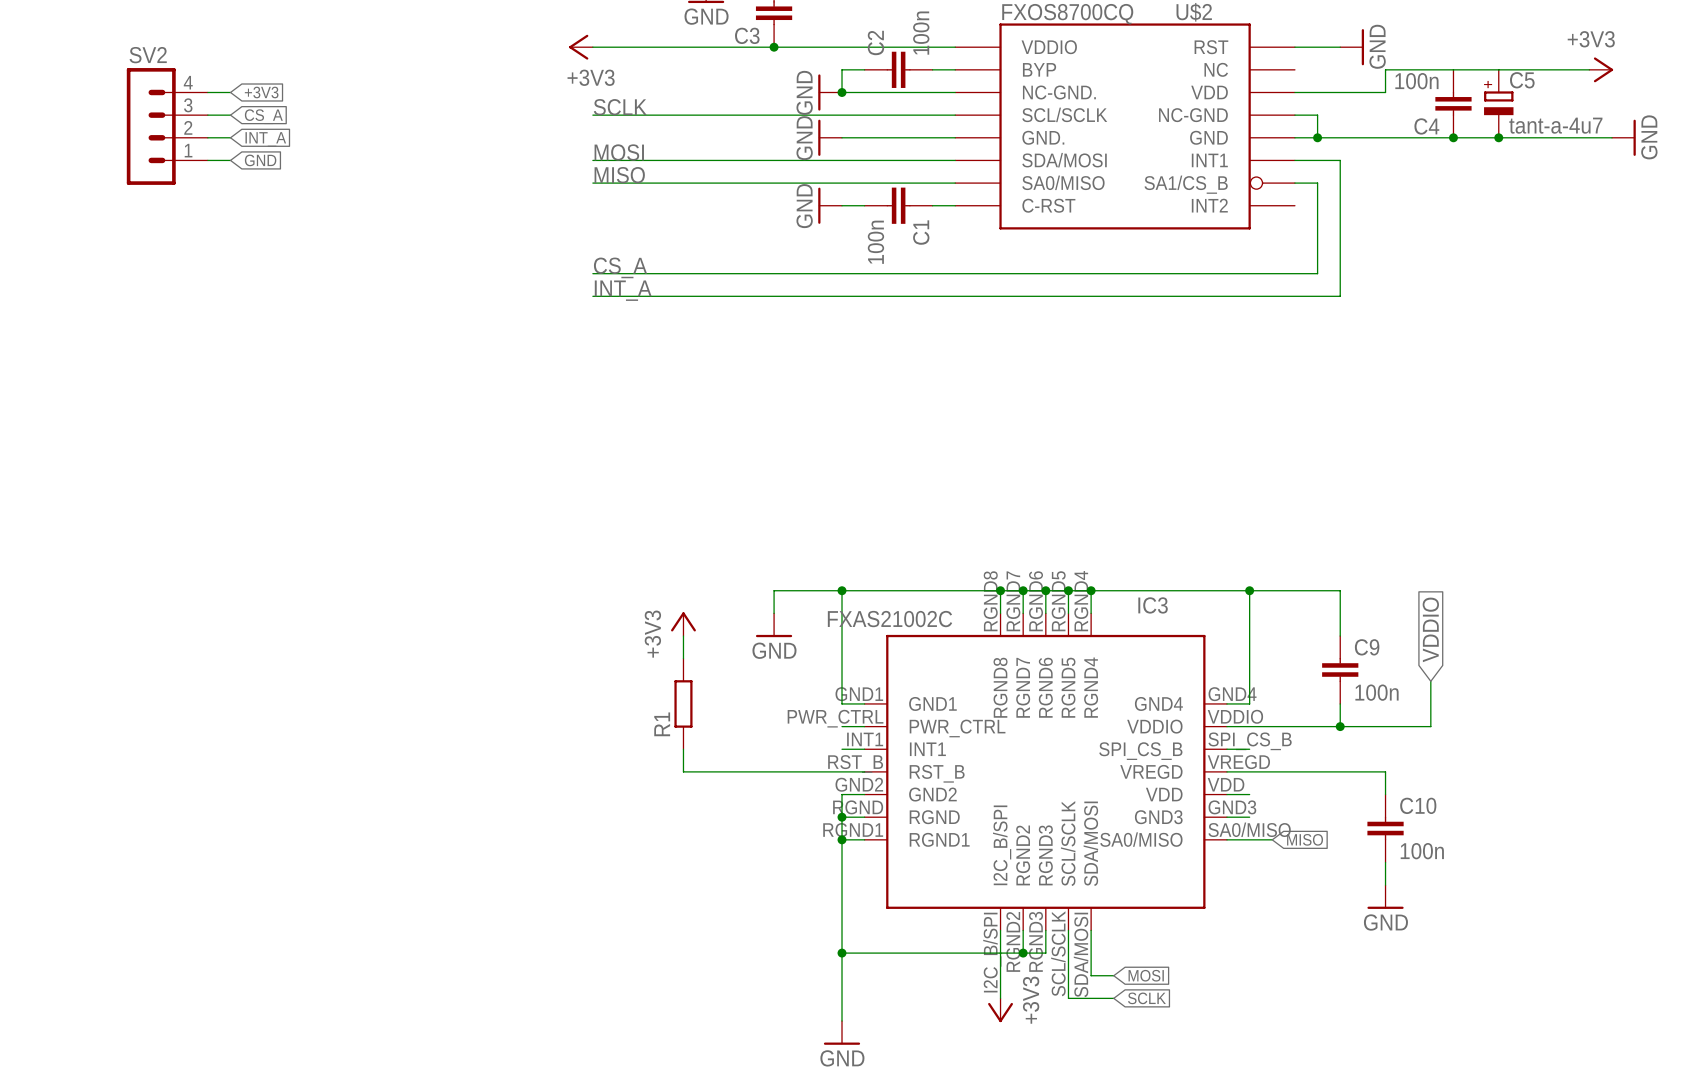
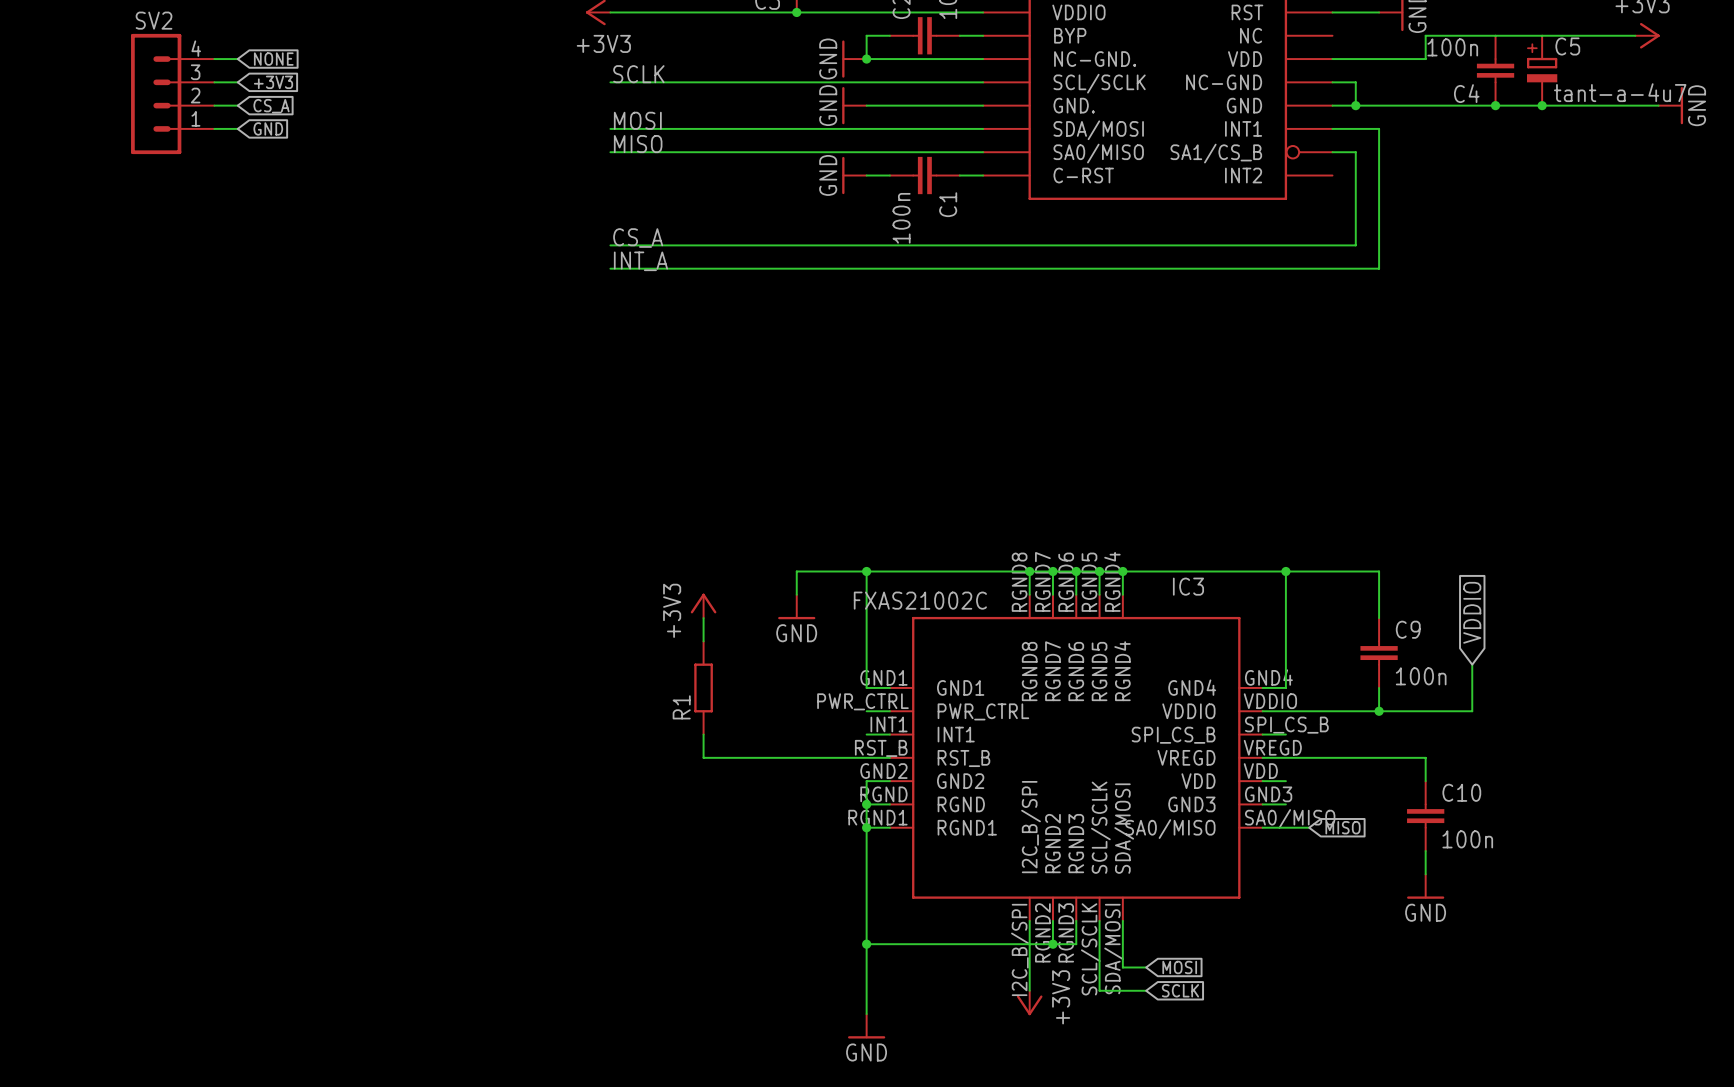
global label: +3V3 (261, 92) -> NONE (273, 59)
global label: CS_A (263, 116) -> +3V3 (273, 82)
global label: INT_A (265, 139) -> CS_A (271, 106)

